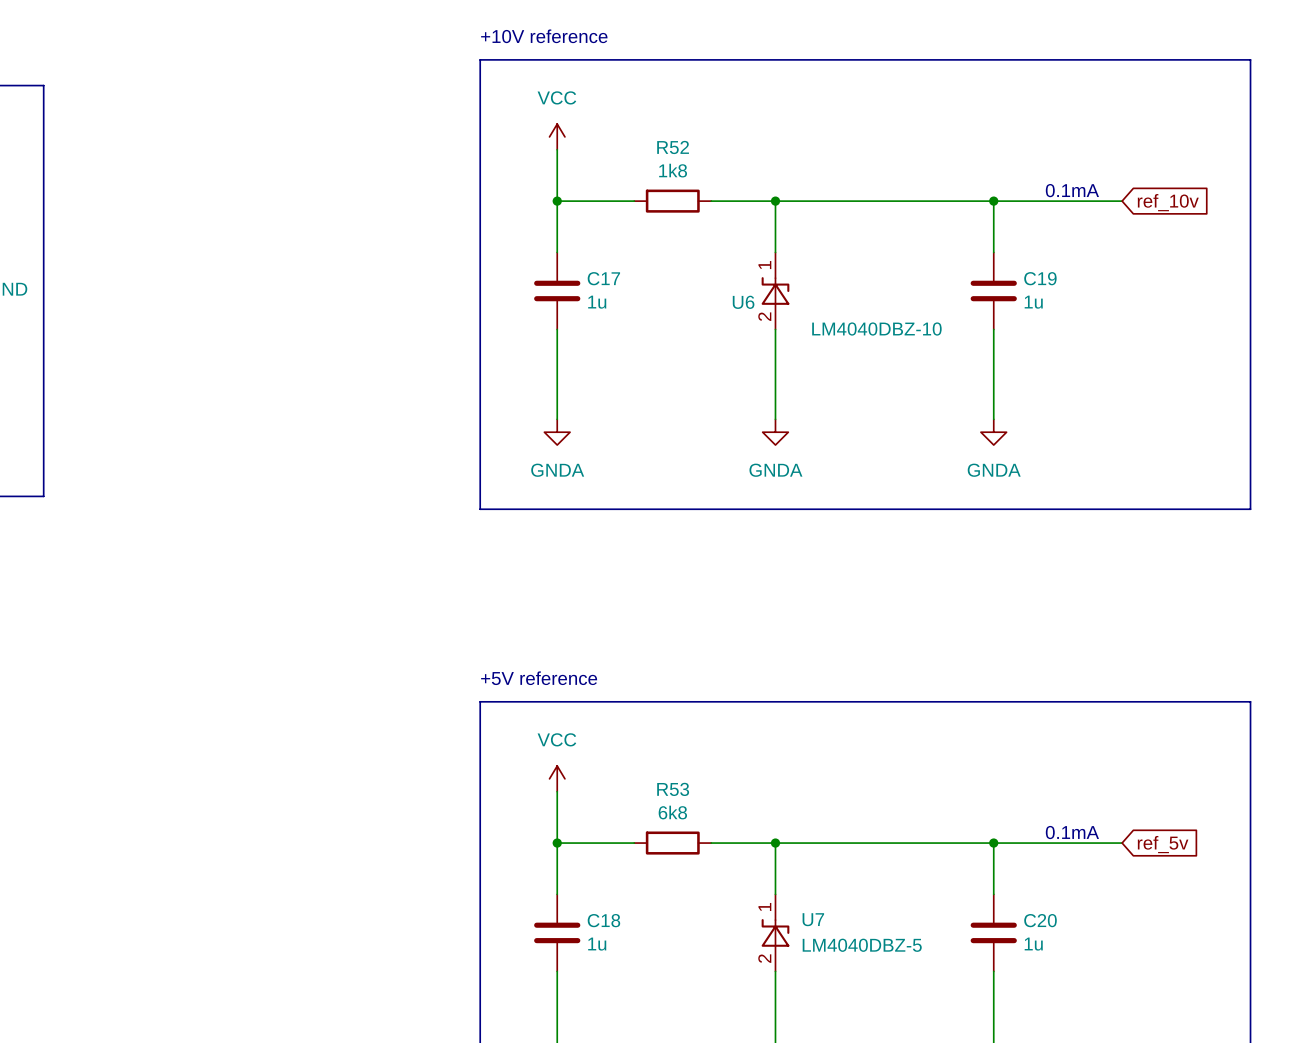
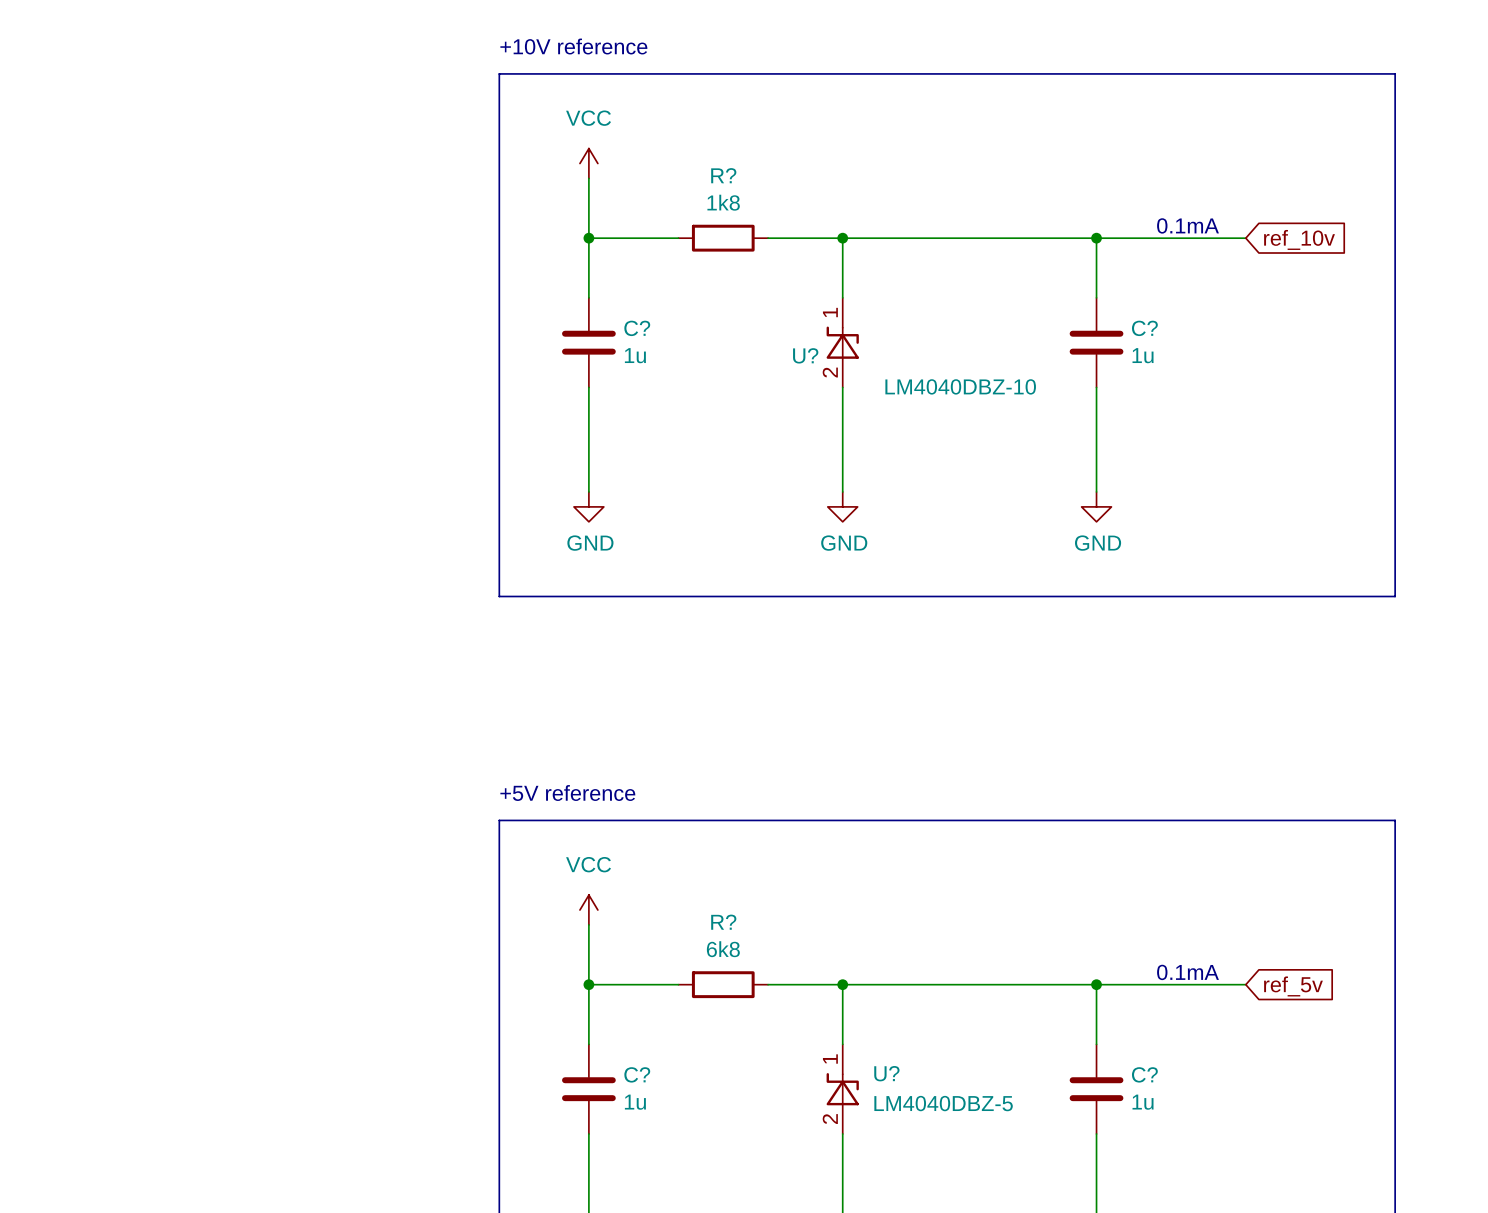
R52 name: R52 (673, 147) -> R? (723, 175)
C17 name: C17 (603, 278) -> C? (637, 328)
C19 name: C19 (1040, 278) -> C? (1144, 328)
U6 name: U6 (743, 302) -> U? (805, 355)
power symbol: GNDA (557, 432) -> GND (588, 506)
power symbol: GNDA (775, 432) -> GND (842, 506)
power symbol: GNDA (993, 432) -> GND (1096, 506)
R53 name: R53 (673, 789) -> R? (723, 922)
U7 name: U7 (813, 919) -> U? (886, 1073)
C18 name: C18 (603, 920) -> C? (637, 1074)
C20 name: C20 (1040, 920) -> C? (1144, 1074)

